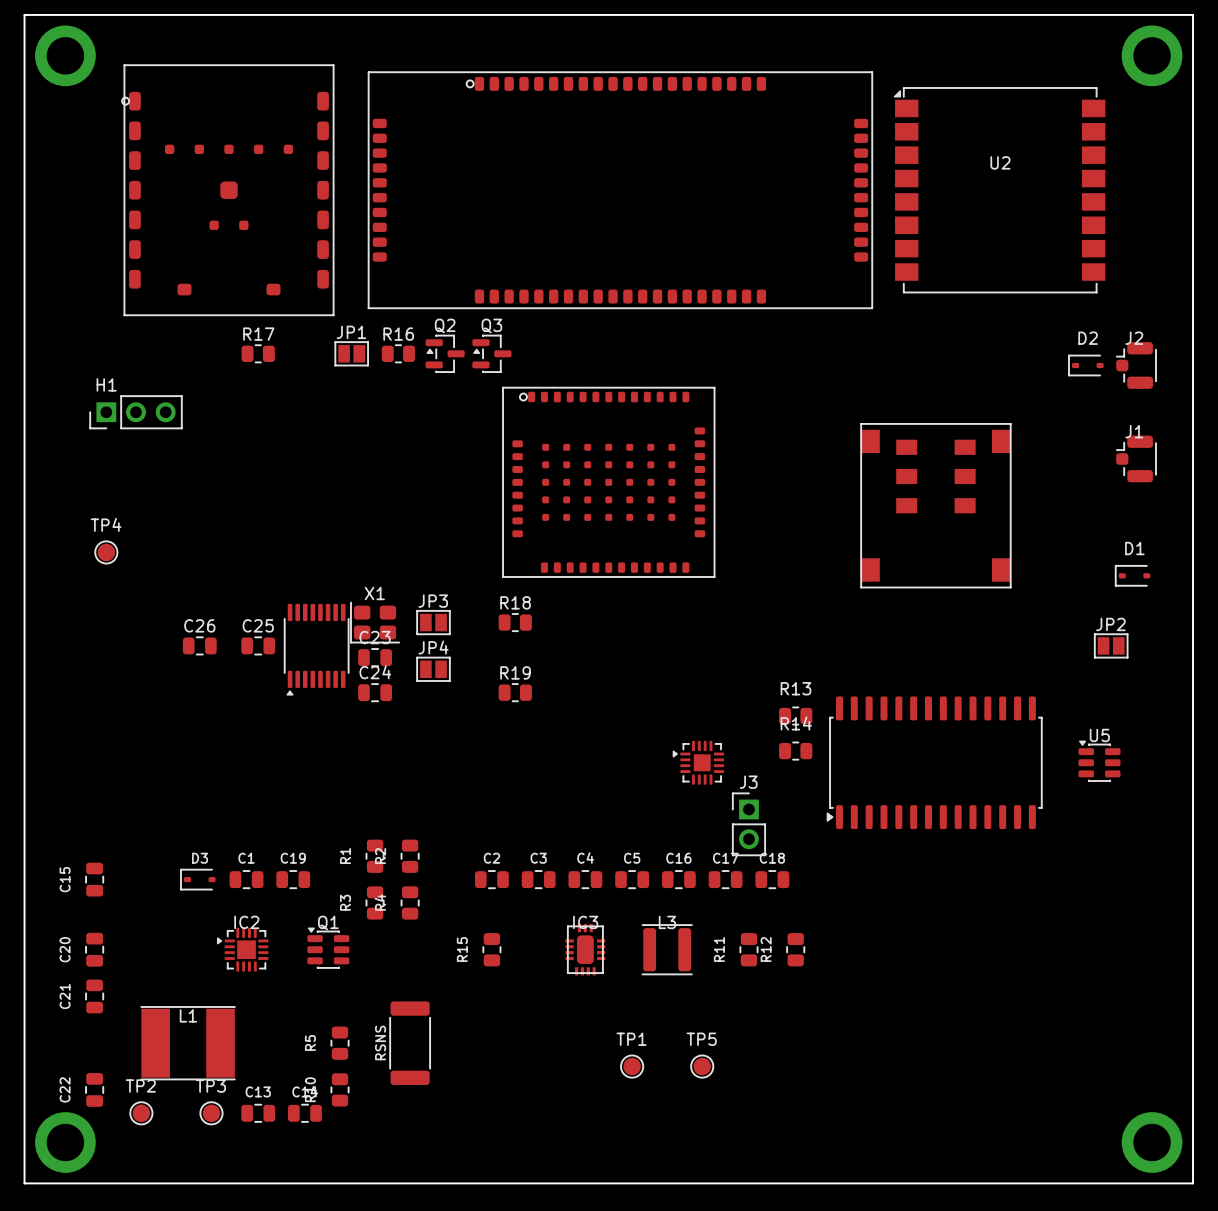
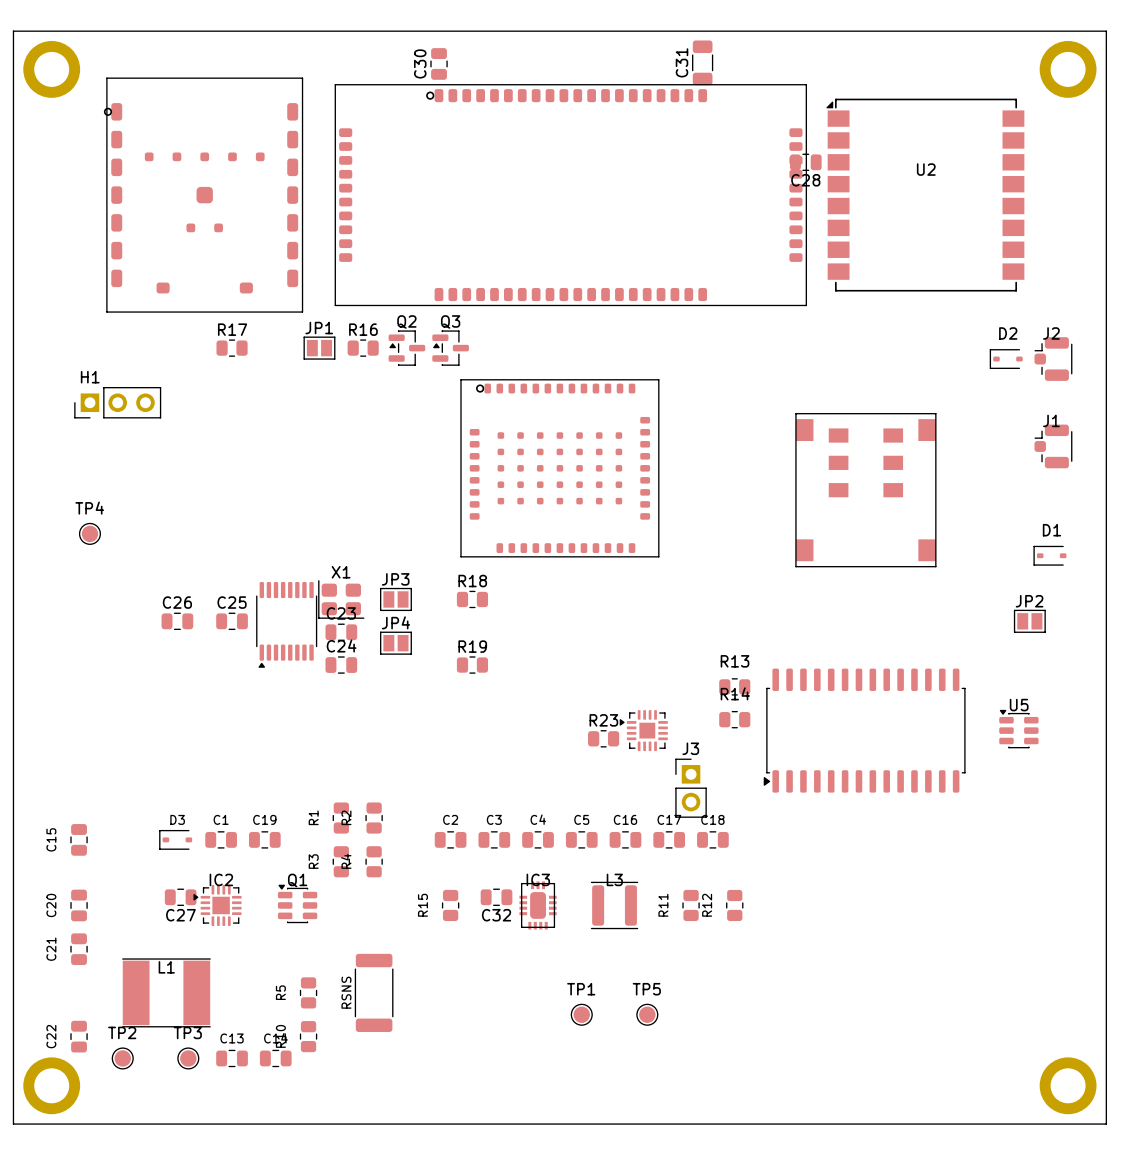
C31: none -> (702, 62)
C30: none -> (439, 63)
C28: none -> (805, 162)
R23: none -> (603, 738)
C27: none -> (180, 897)
C32: none -> (496, 897)

